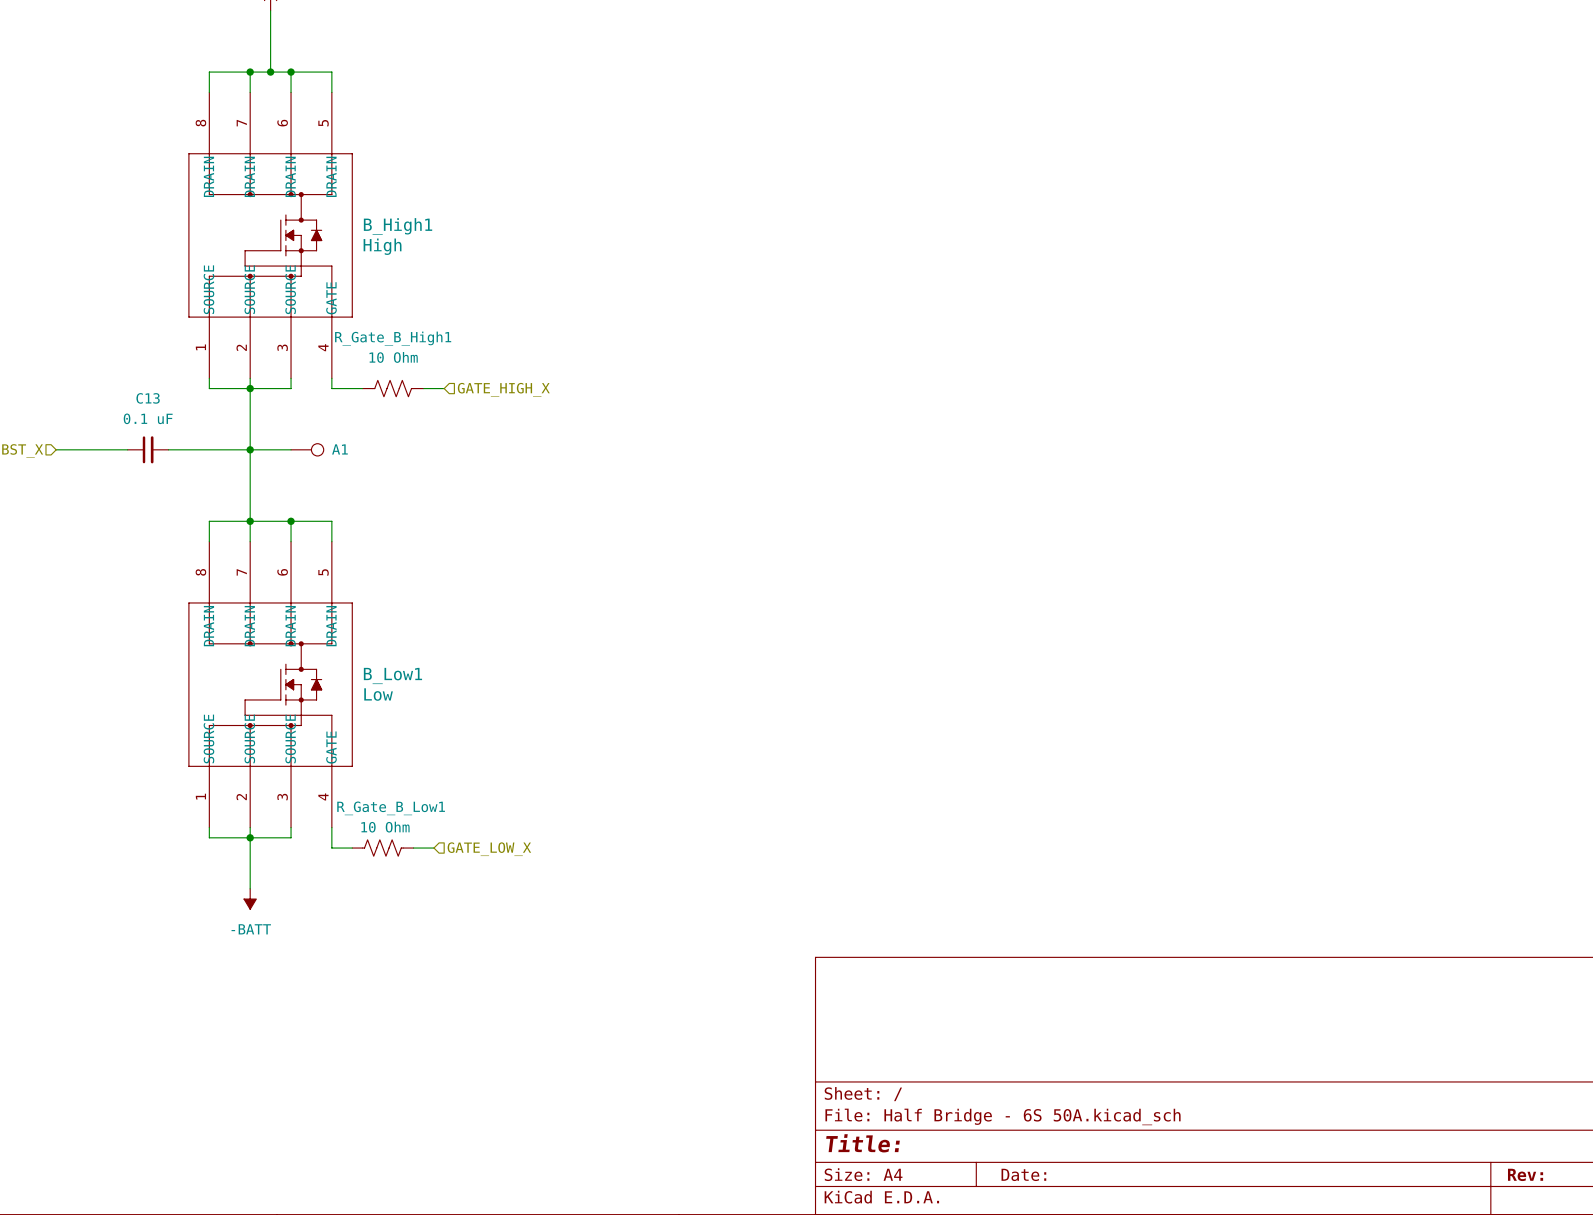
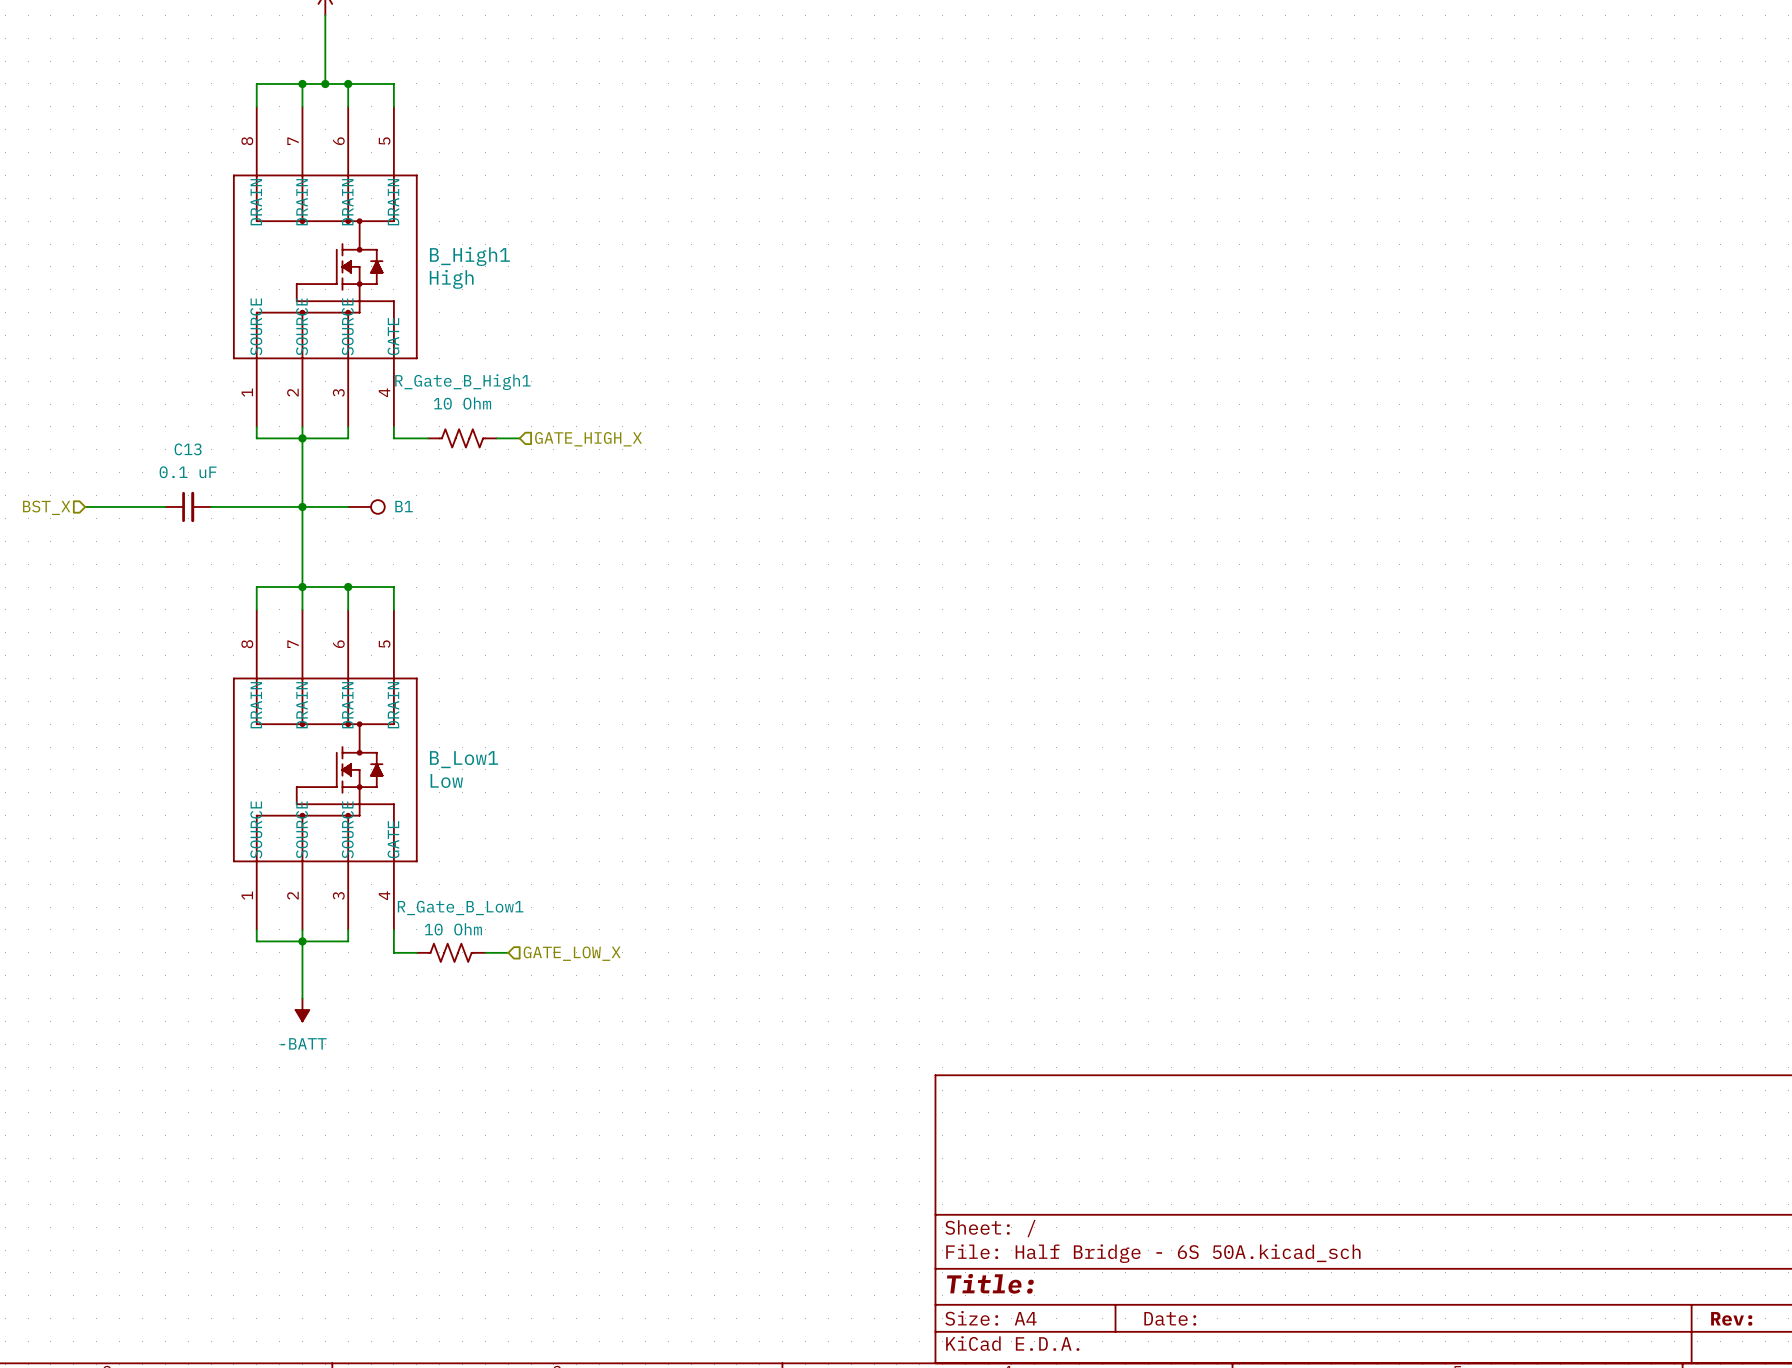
A1 name: A1 (339, 449) -> B1 (404, 506)

